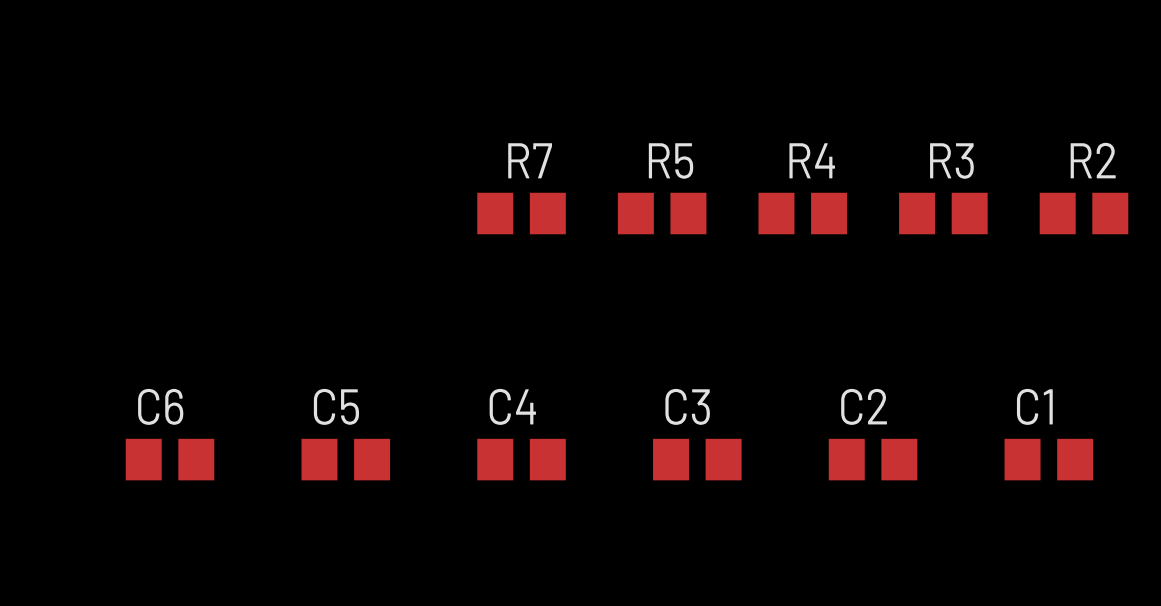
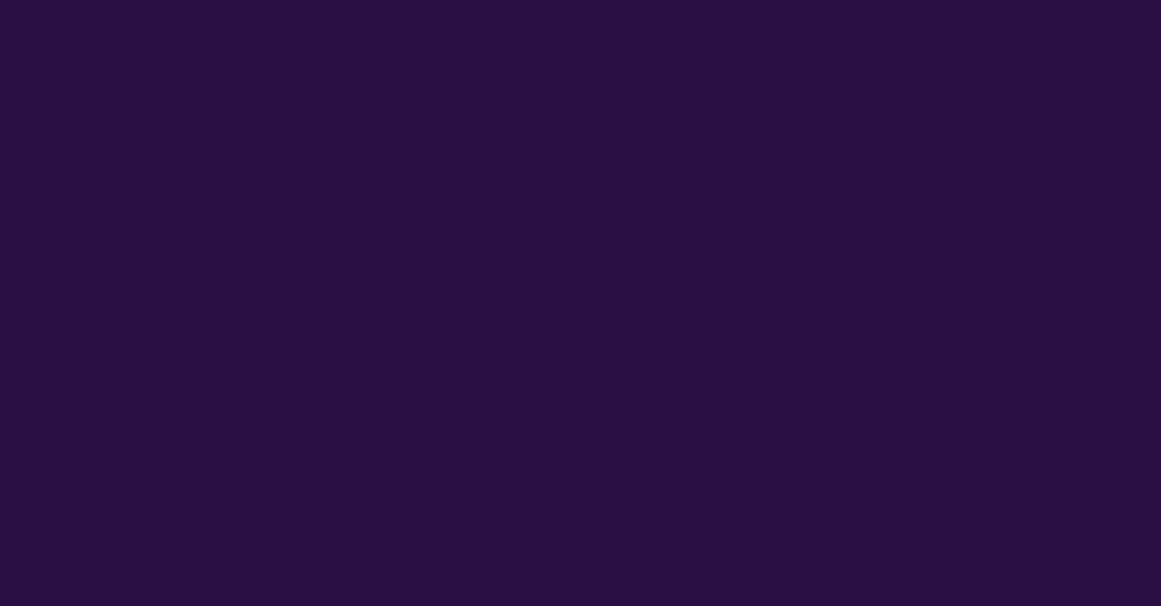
R7: (521, 213) -> none
R5: (662, 213) -> none
R4: (802, 213) -> none
R3: (943, 213) -> none
R2: (1083, 213) -> none
C6: (170, 459) -> none
C5: (345, 459) -> none
C4: (521, 459) -> none
C3: (697, 459) -> none
C2: (873, 459) -> none
C1: (1048, 459) -> none

